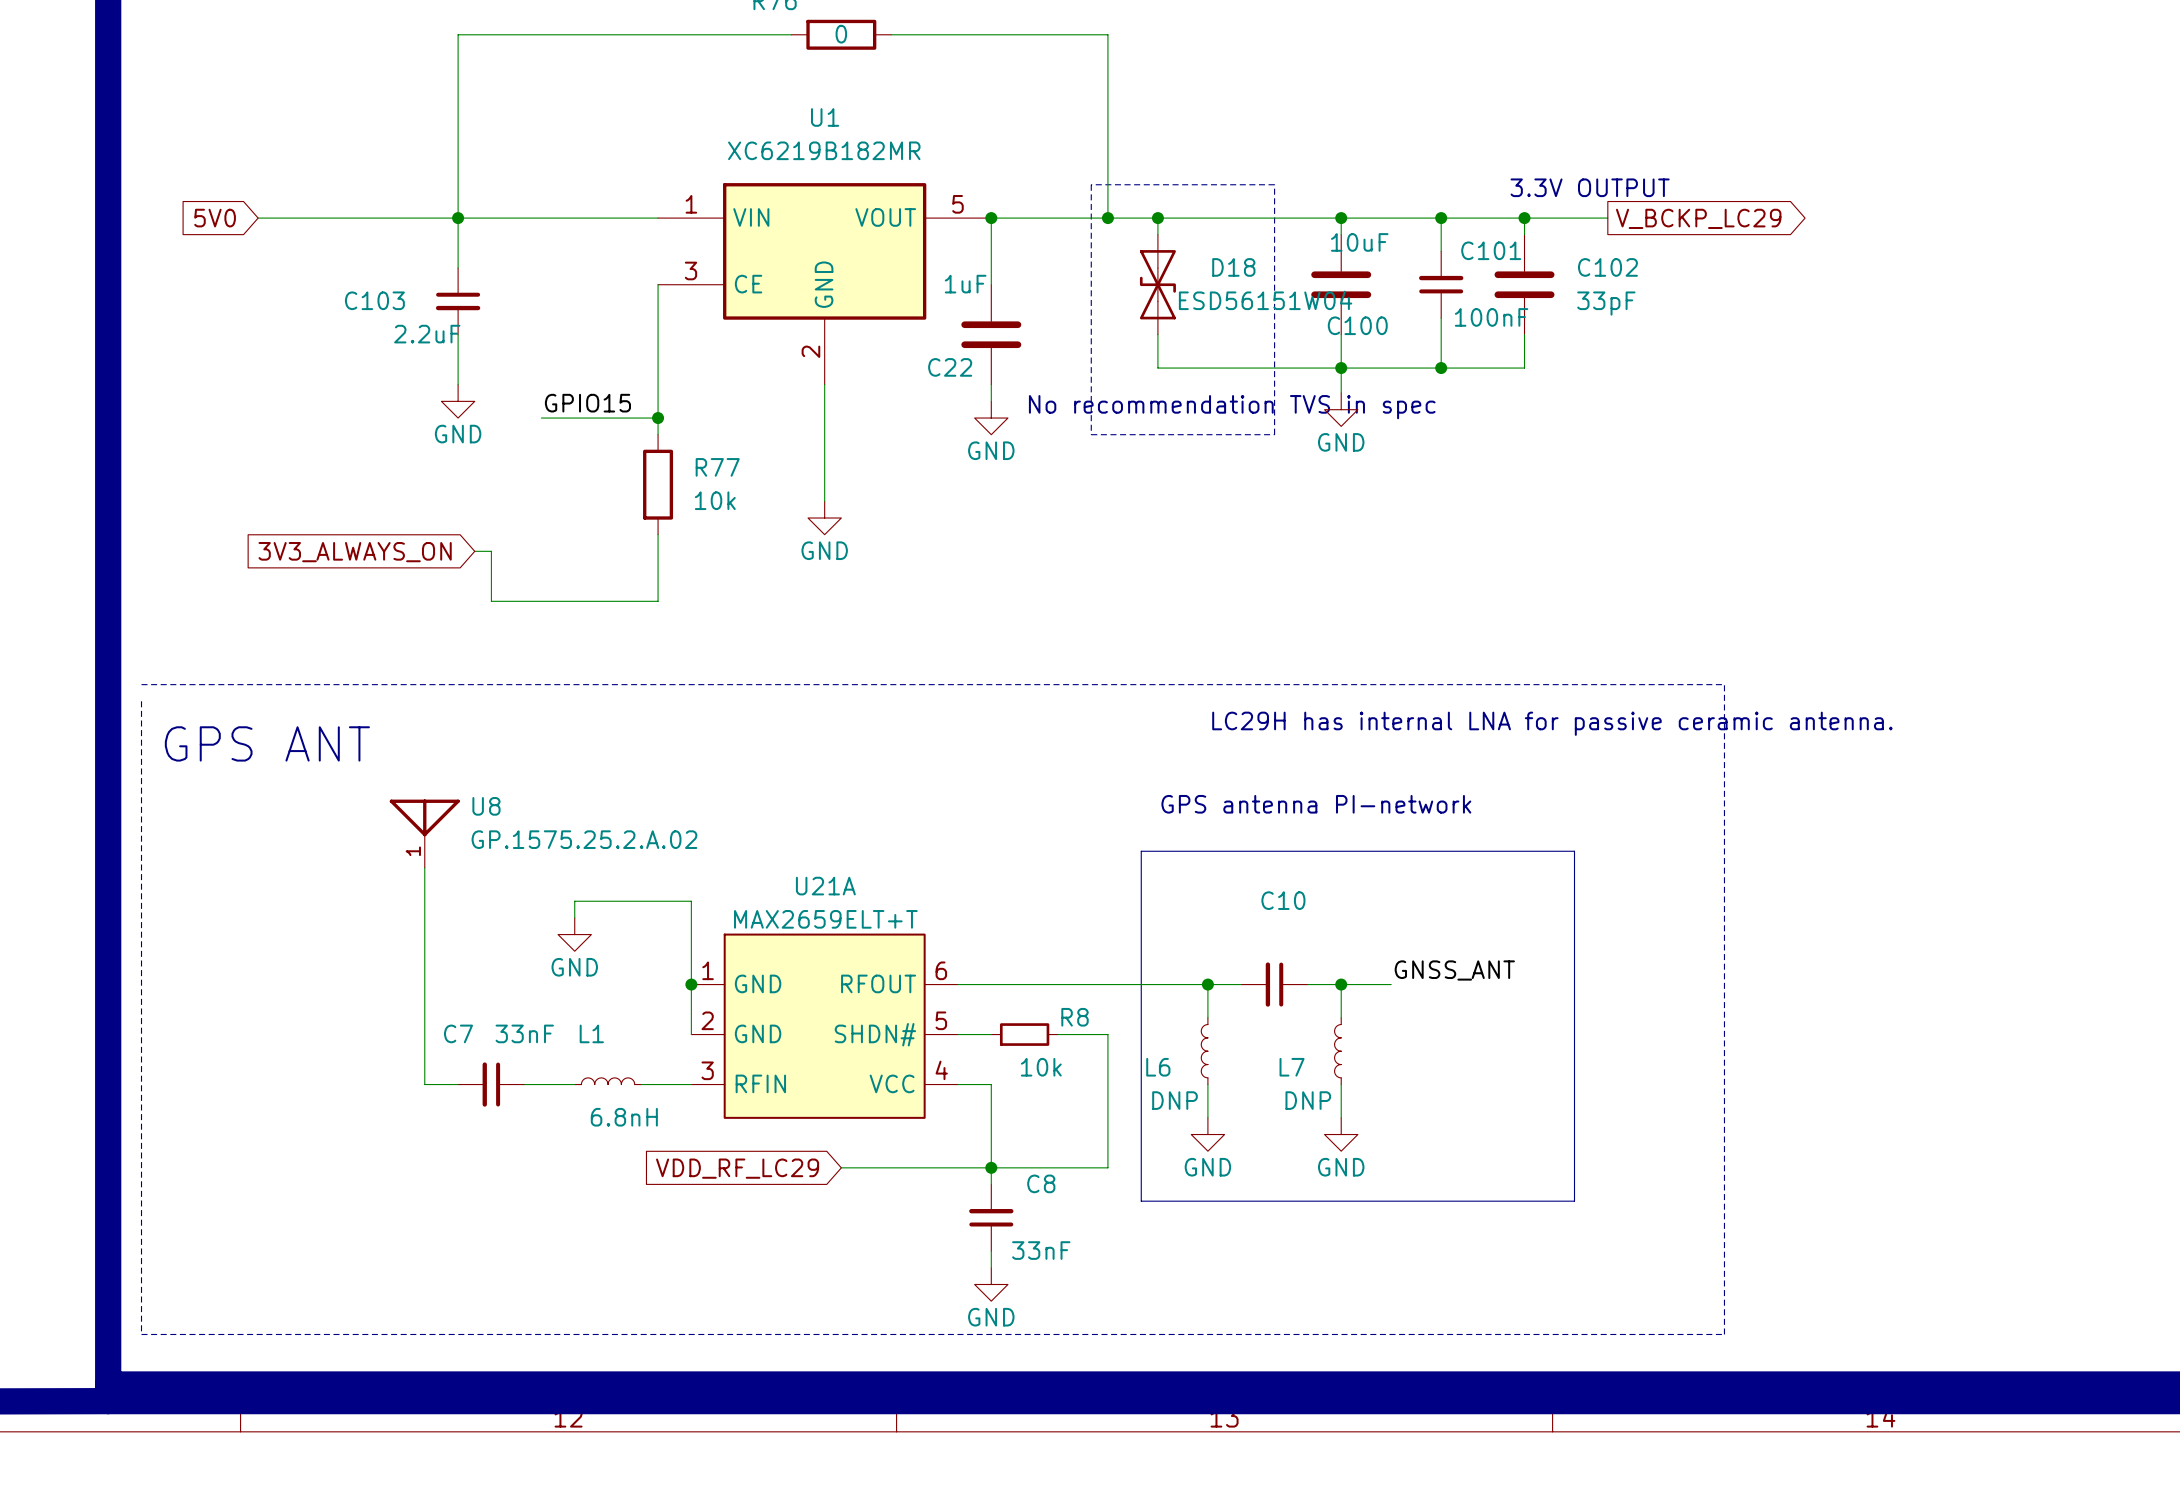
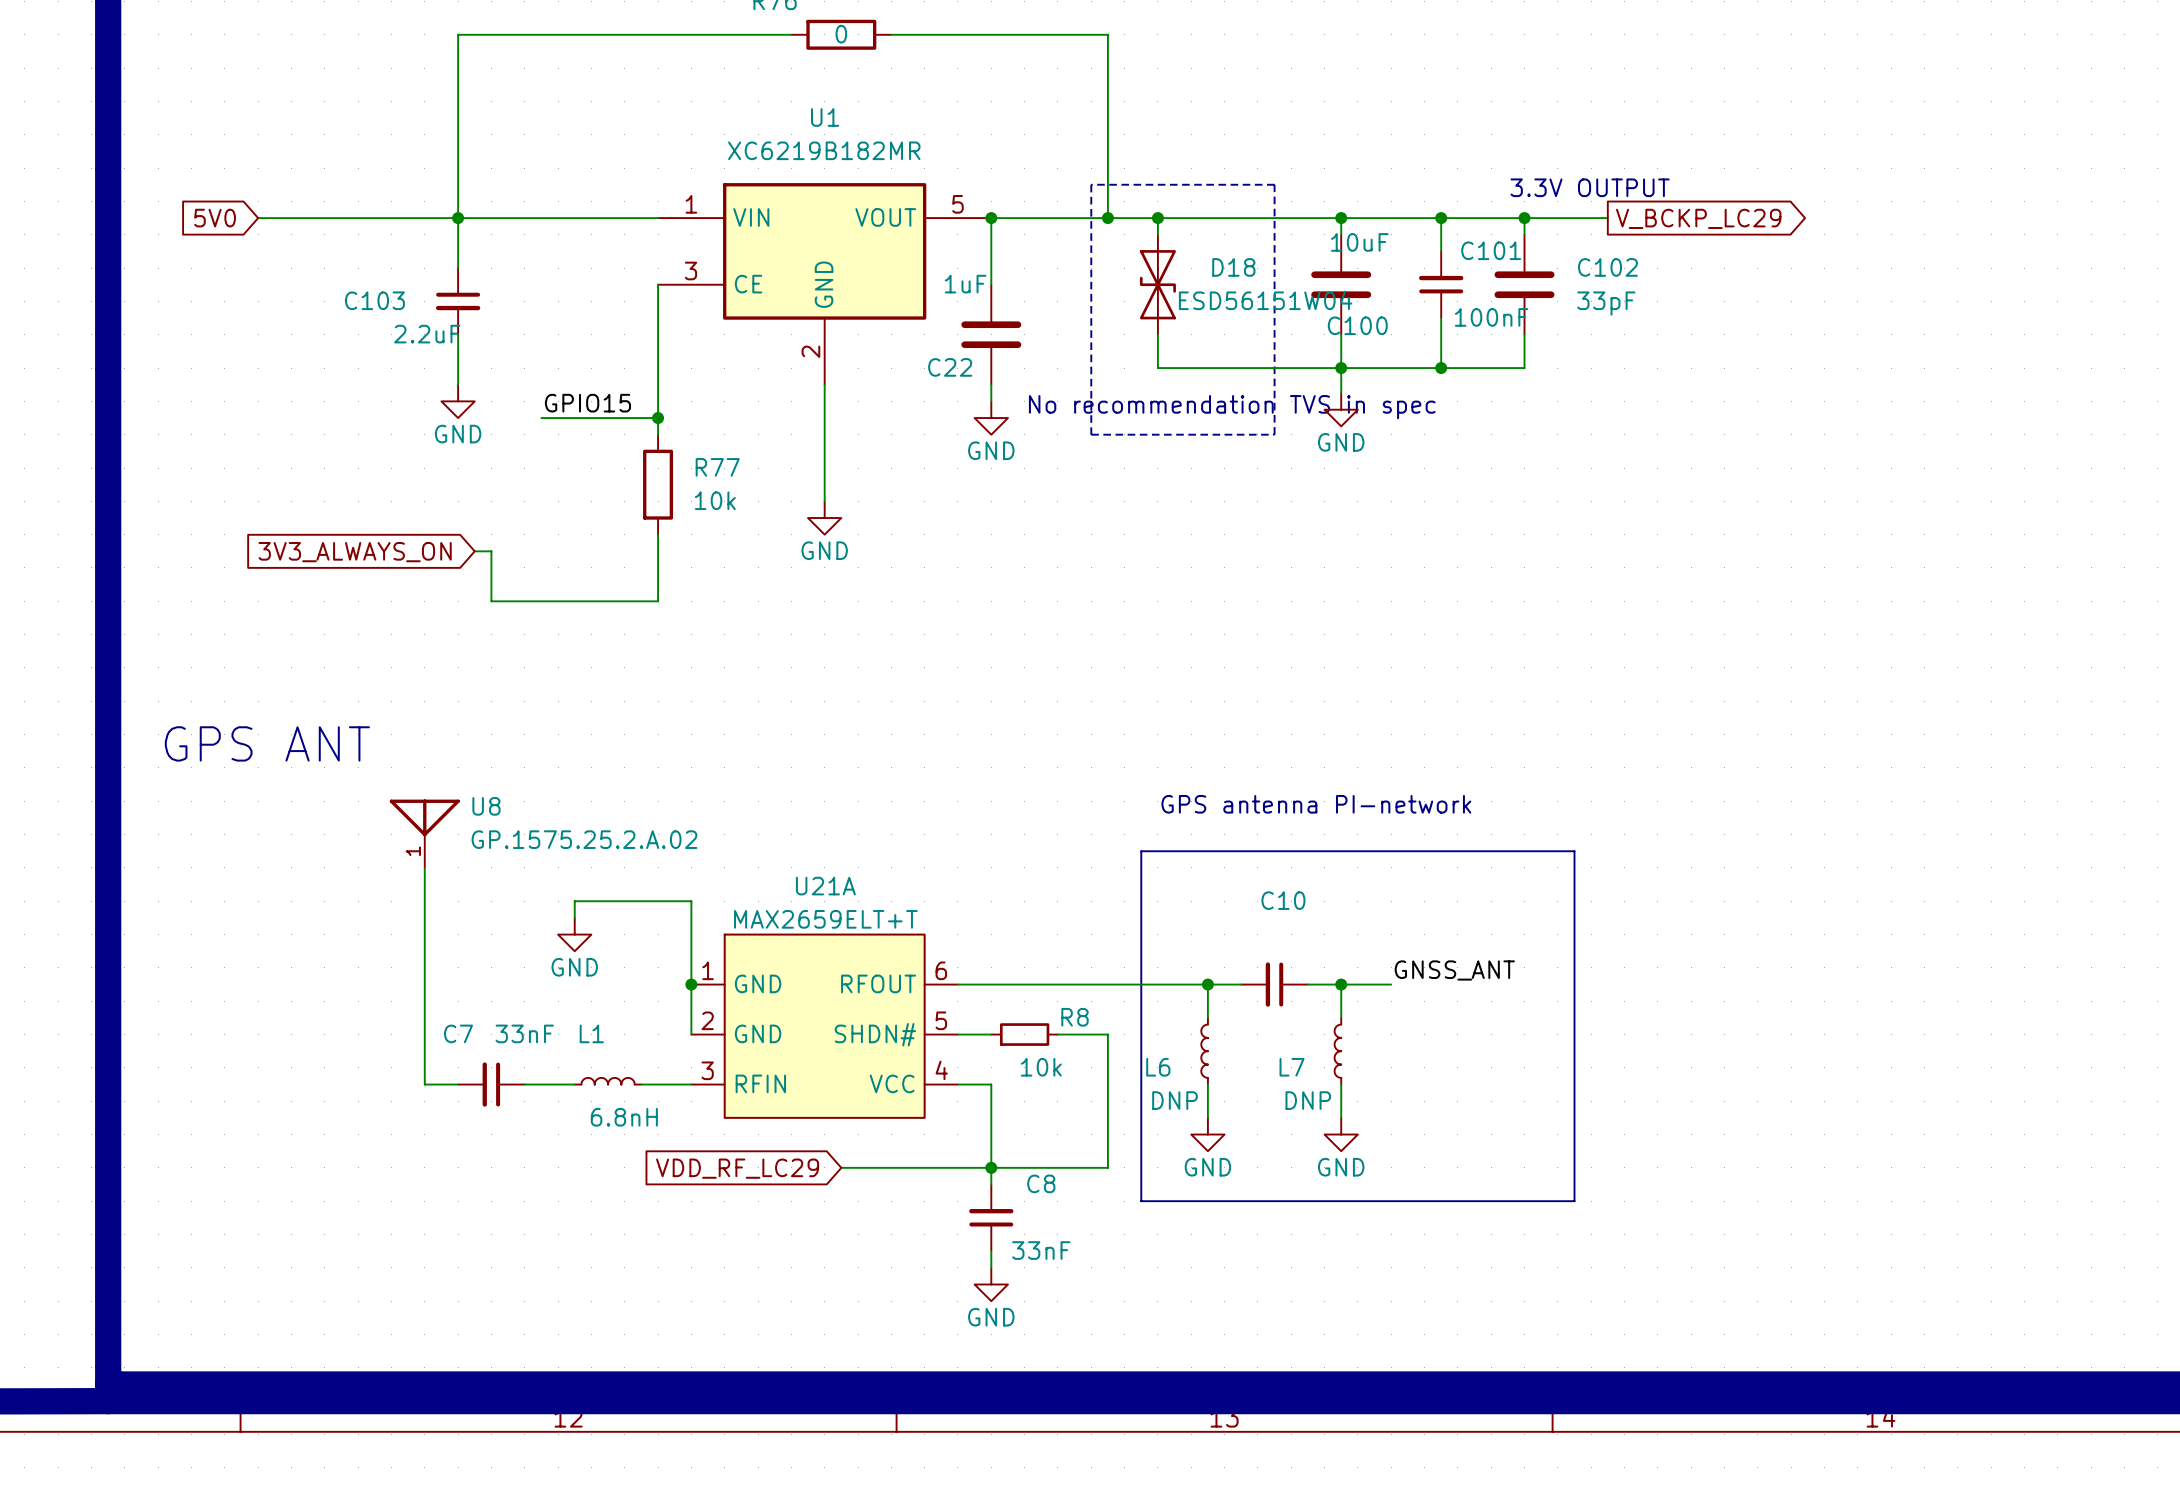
line: (141, 684) (1724, 684) (1724, 1334) (141, 1334) (141, 701) -> none
text: LC29H has internal LNA for passive ceramic antenna. (1552, 723) -> none

